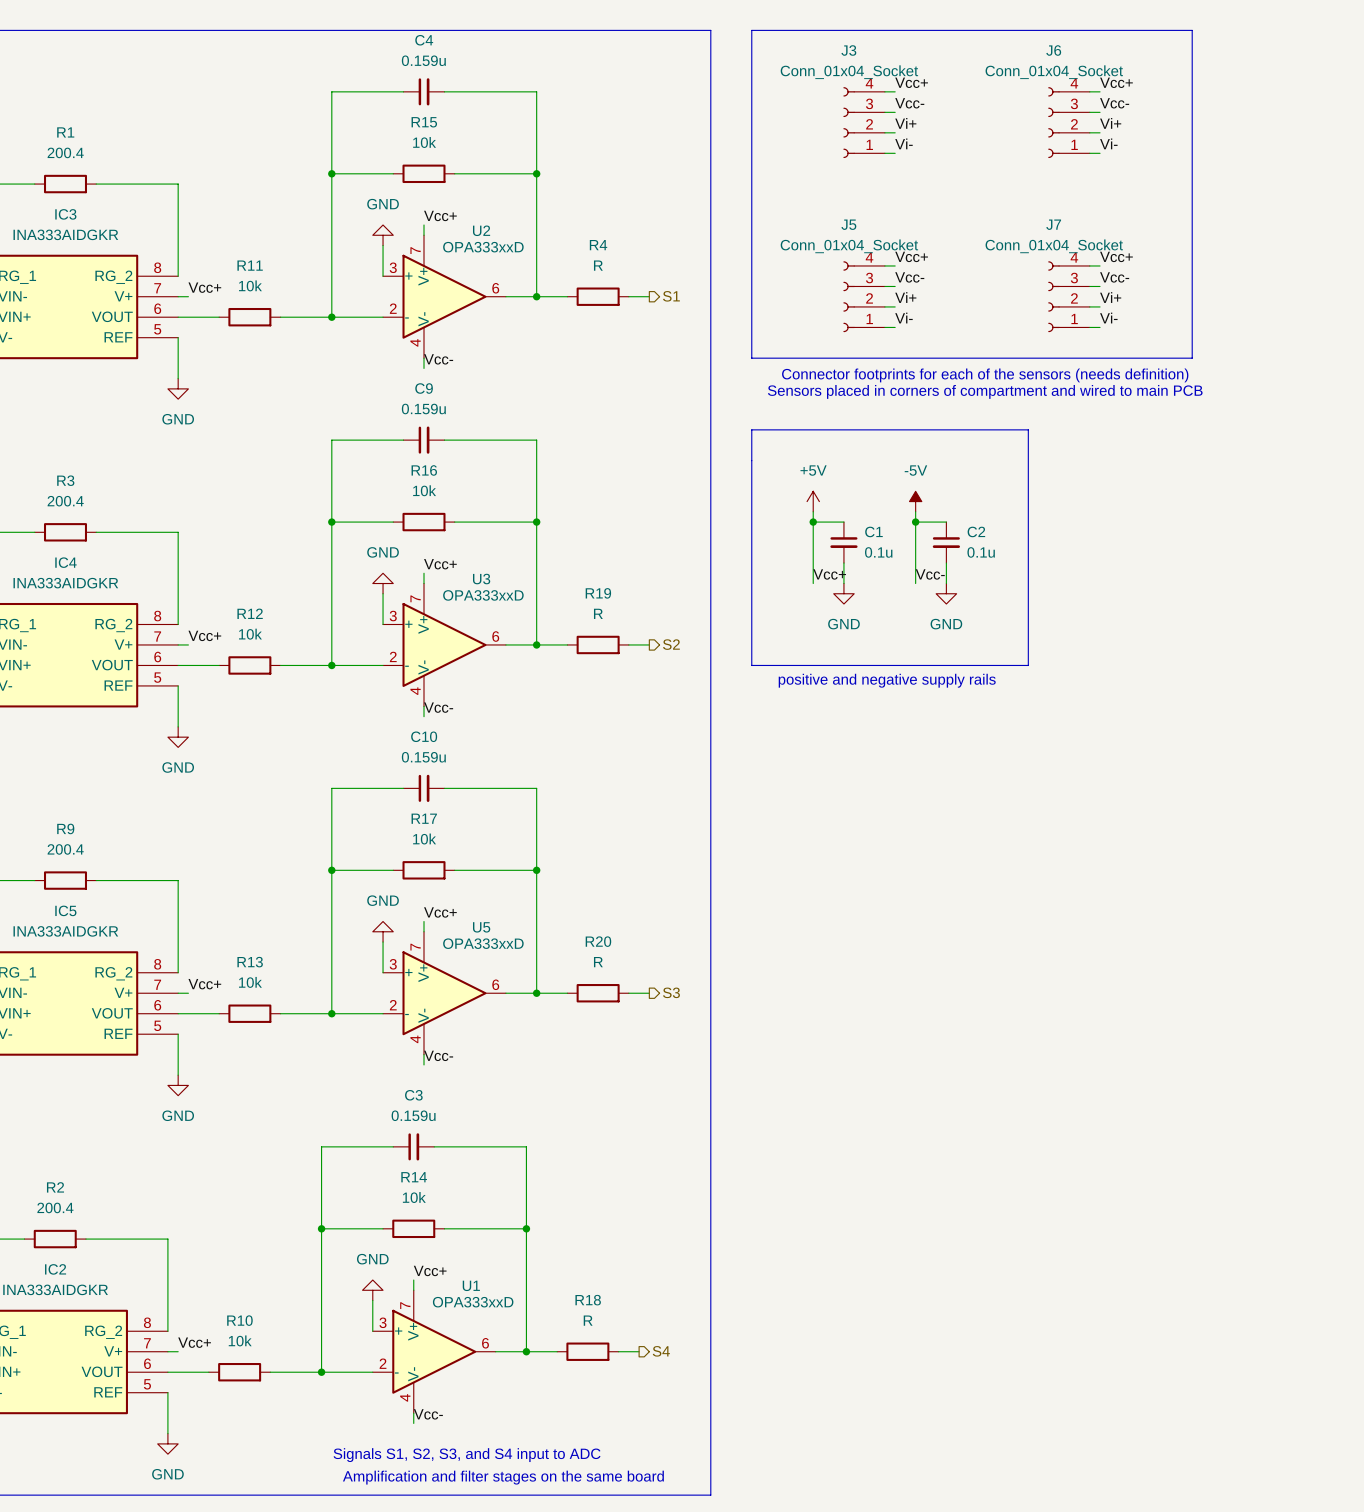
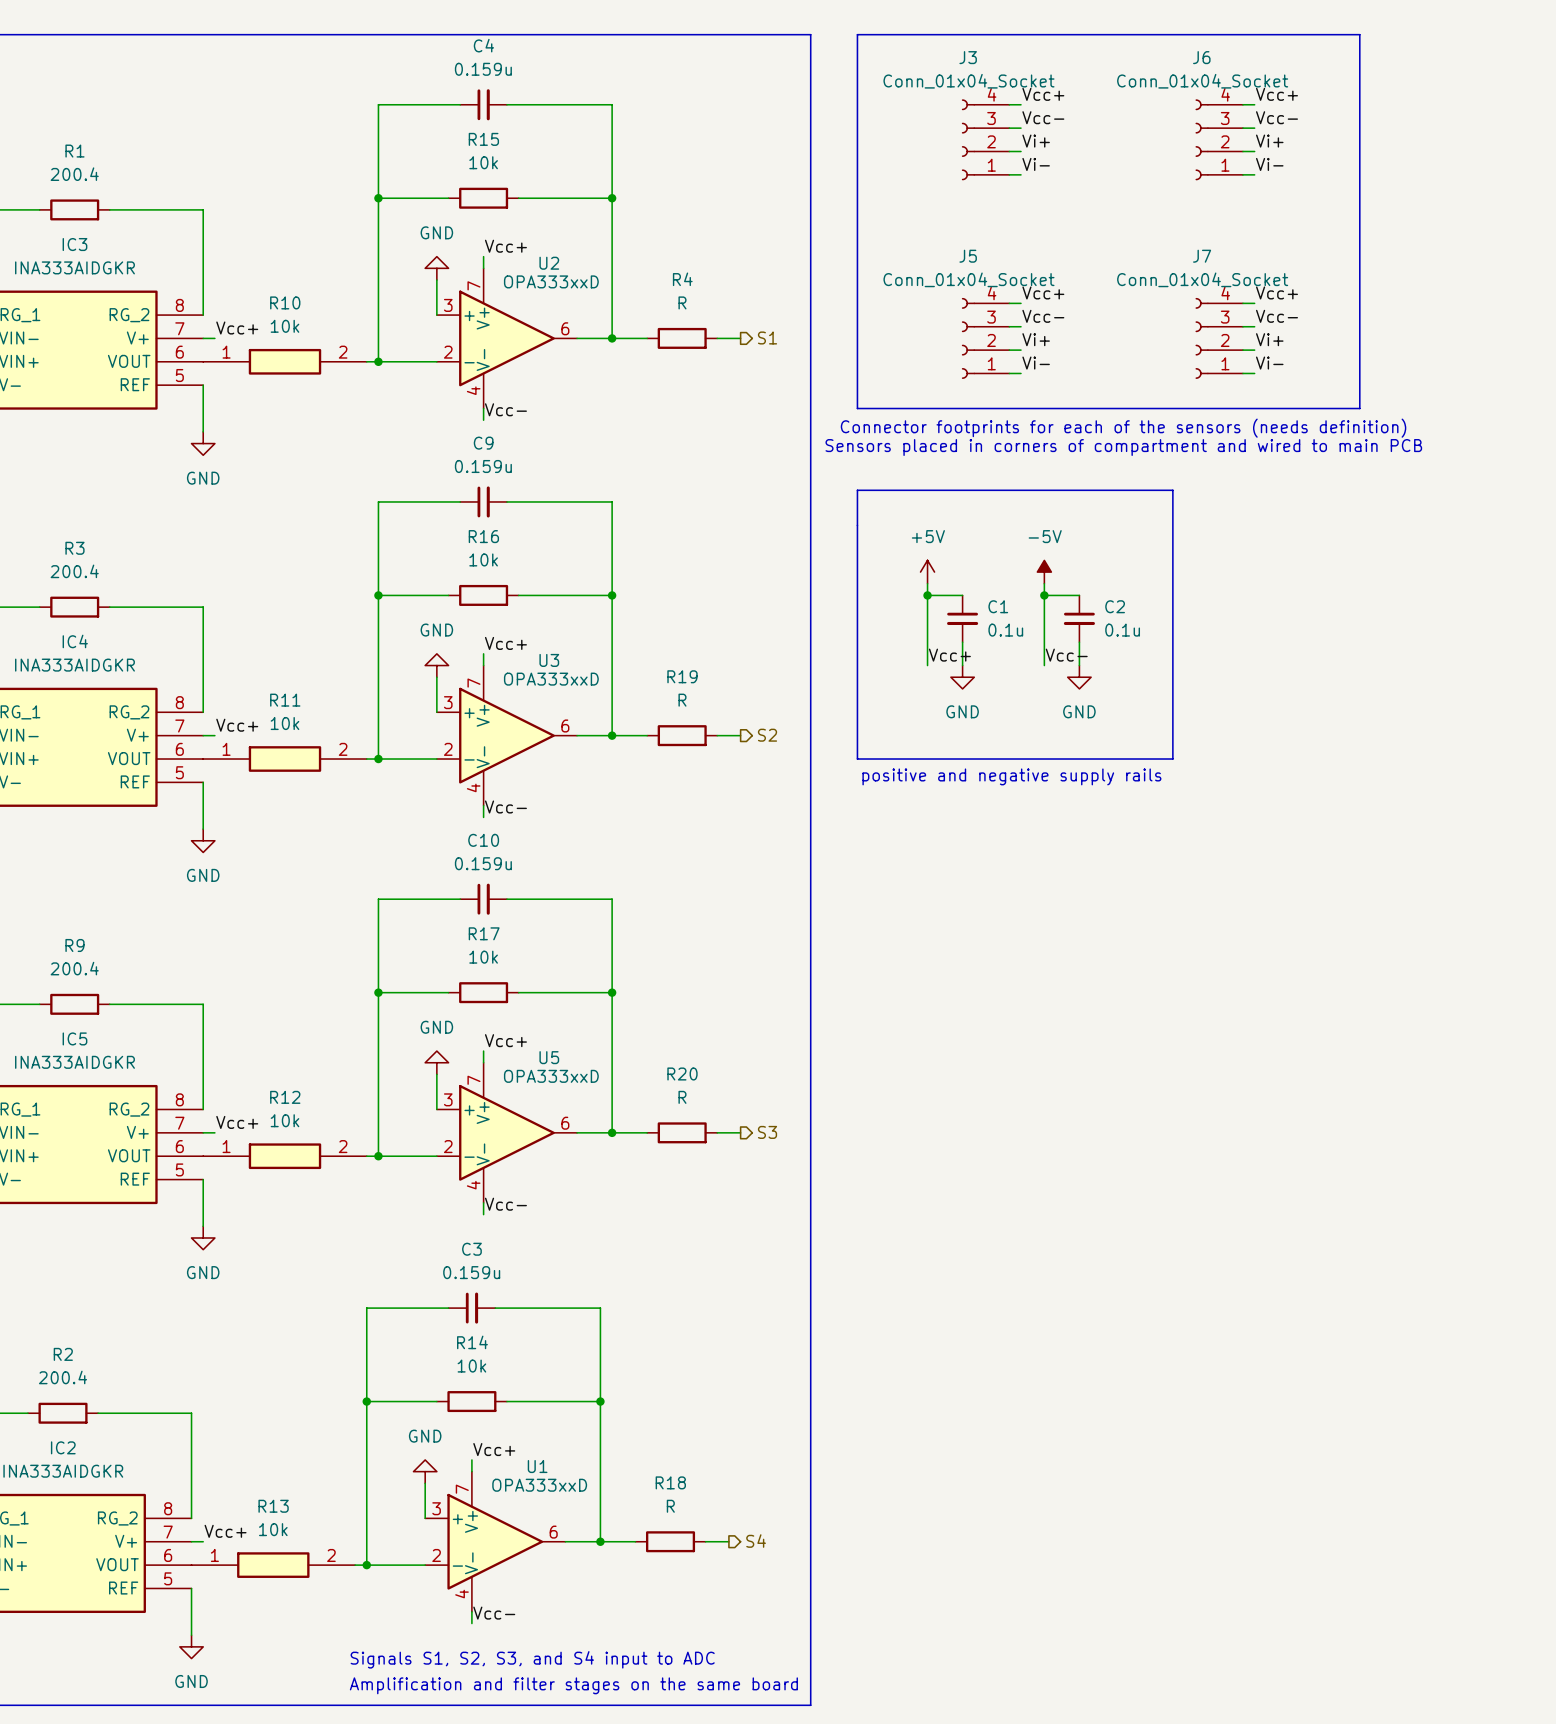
R11 symbol: [219, 307, 281, 327] -> [203, 746, 367, 772]
R12 symbol: [219, 656, 281, 675] -> [203, 1143, 367, 1170]
R13 symbol: [219, 1004, 281, 1023] -> [191, 1552, 356, 1578]
R10 symbol: [208, 1363, 271, 1382] -> [203, 348, 367, 375]

